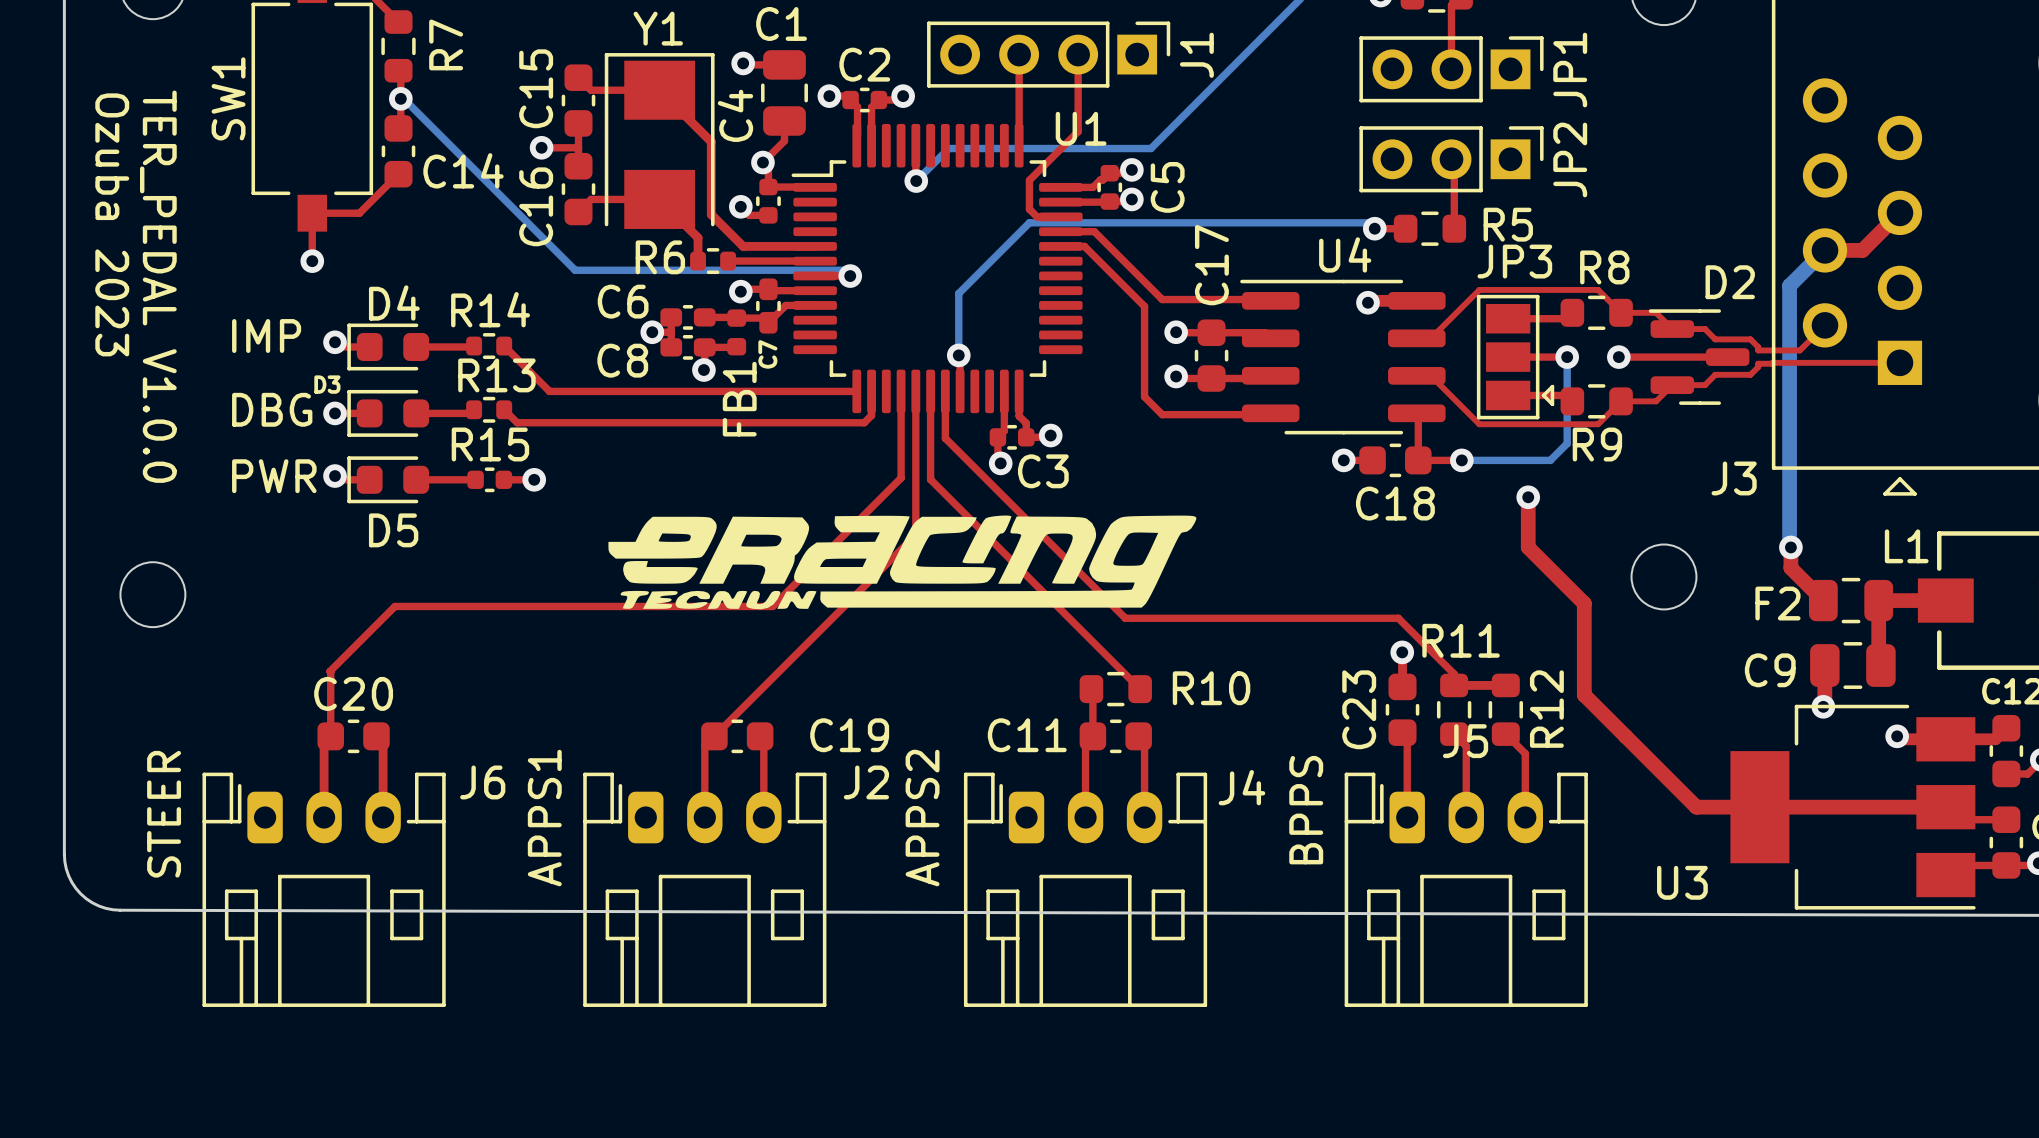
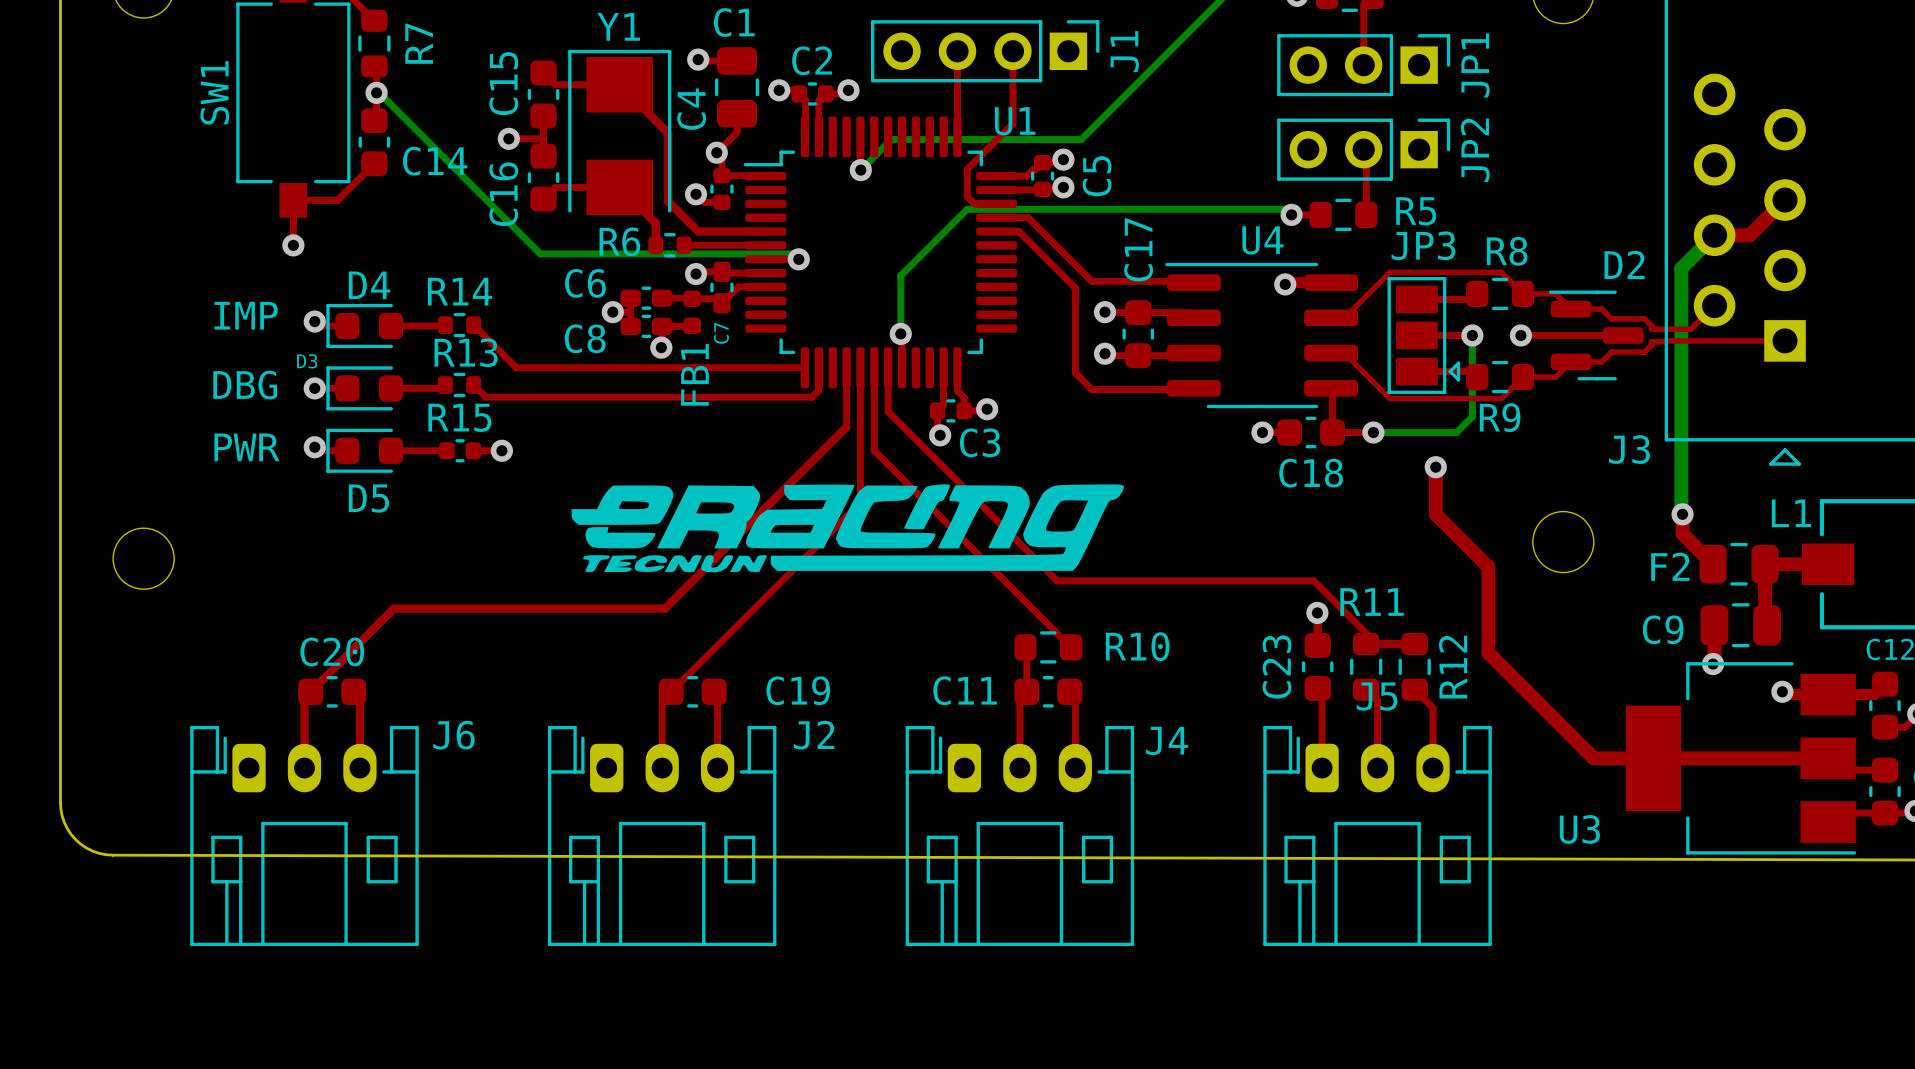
text: Ozuba 2023 (112, 224) -> none
text: TER_PEDAL V1.0.0 (158, 286) -> none
top track: (901, 454) (901, 478) (772, 606) (394, 606) (329, 671) (330, 736) -> (846, 426) (664, 608) (393, 608) (310, 691)
text: BPPS (1306, 810) -> none
text: STEER (164, 814) -> none
text: APPS1 (544, 818) -> none
text: APPS2 (922, 818) -> none

